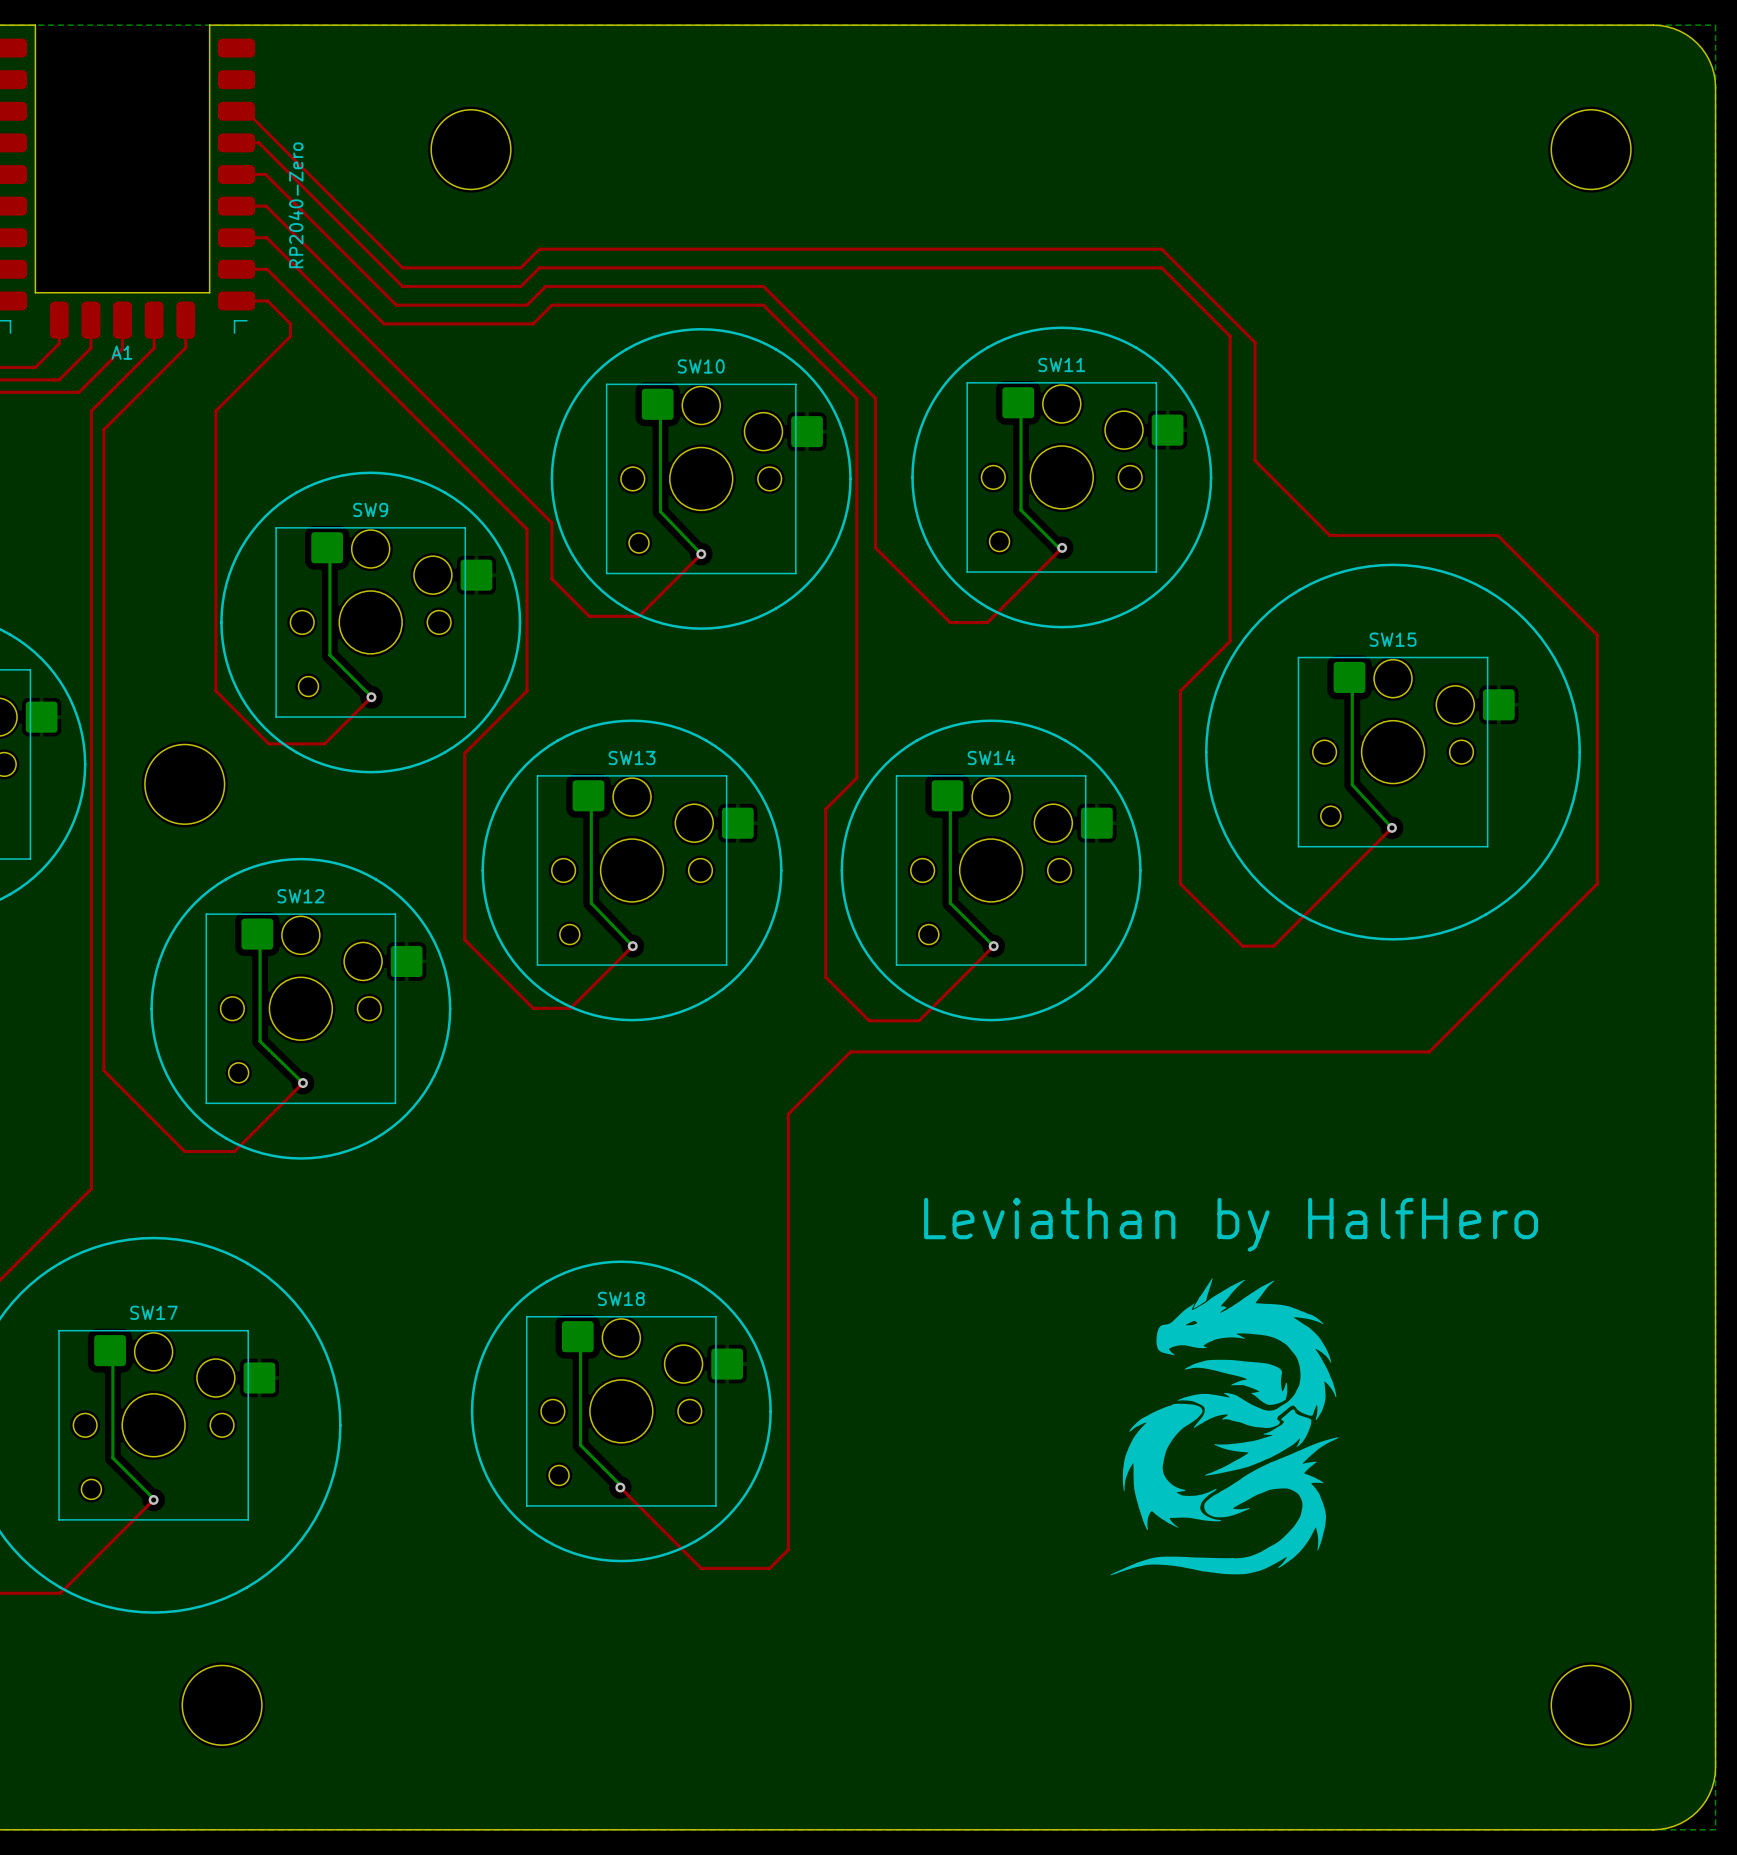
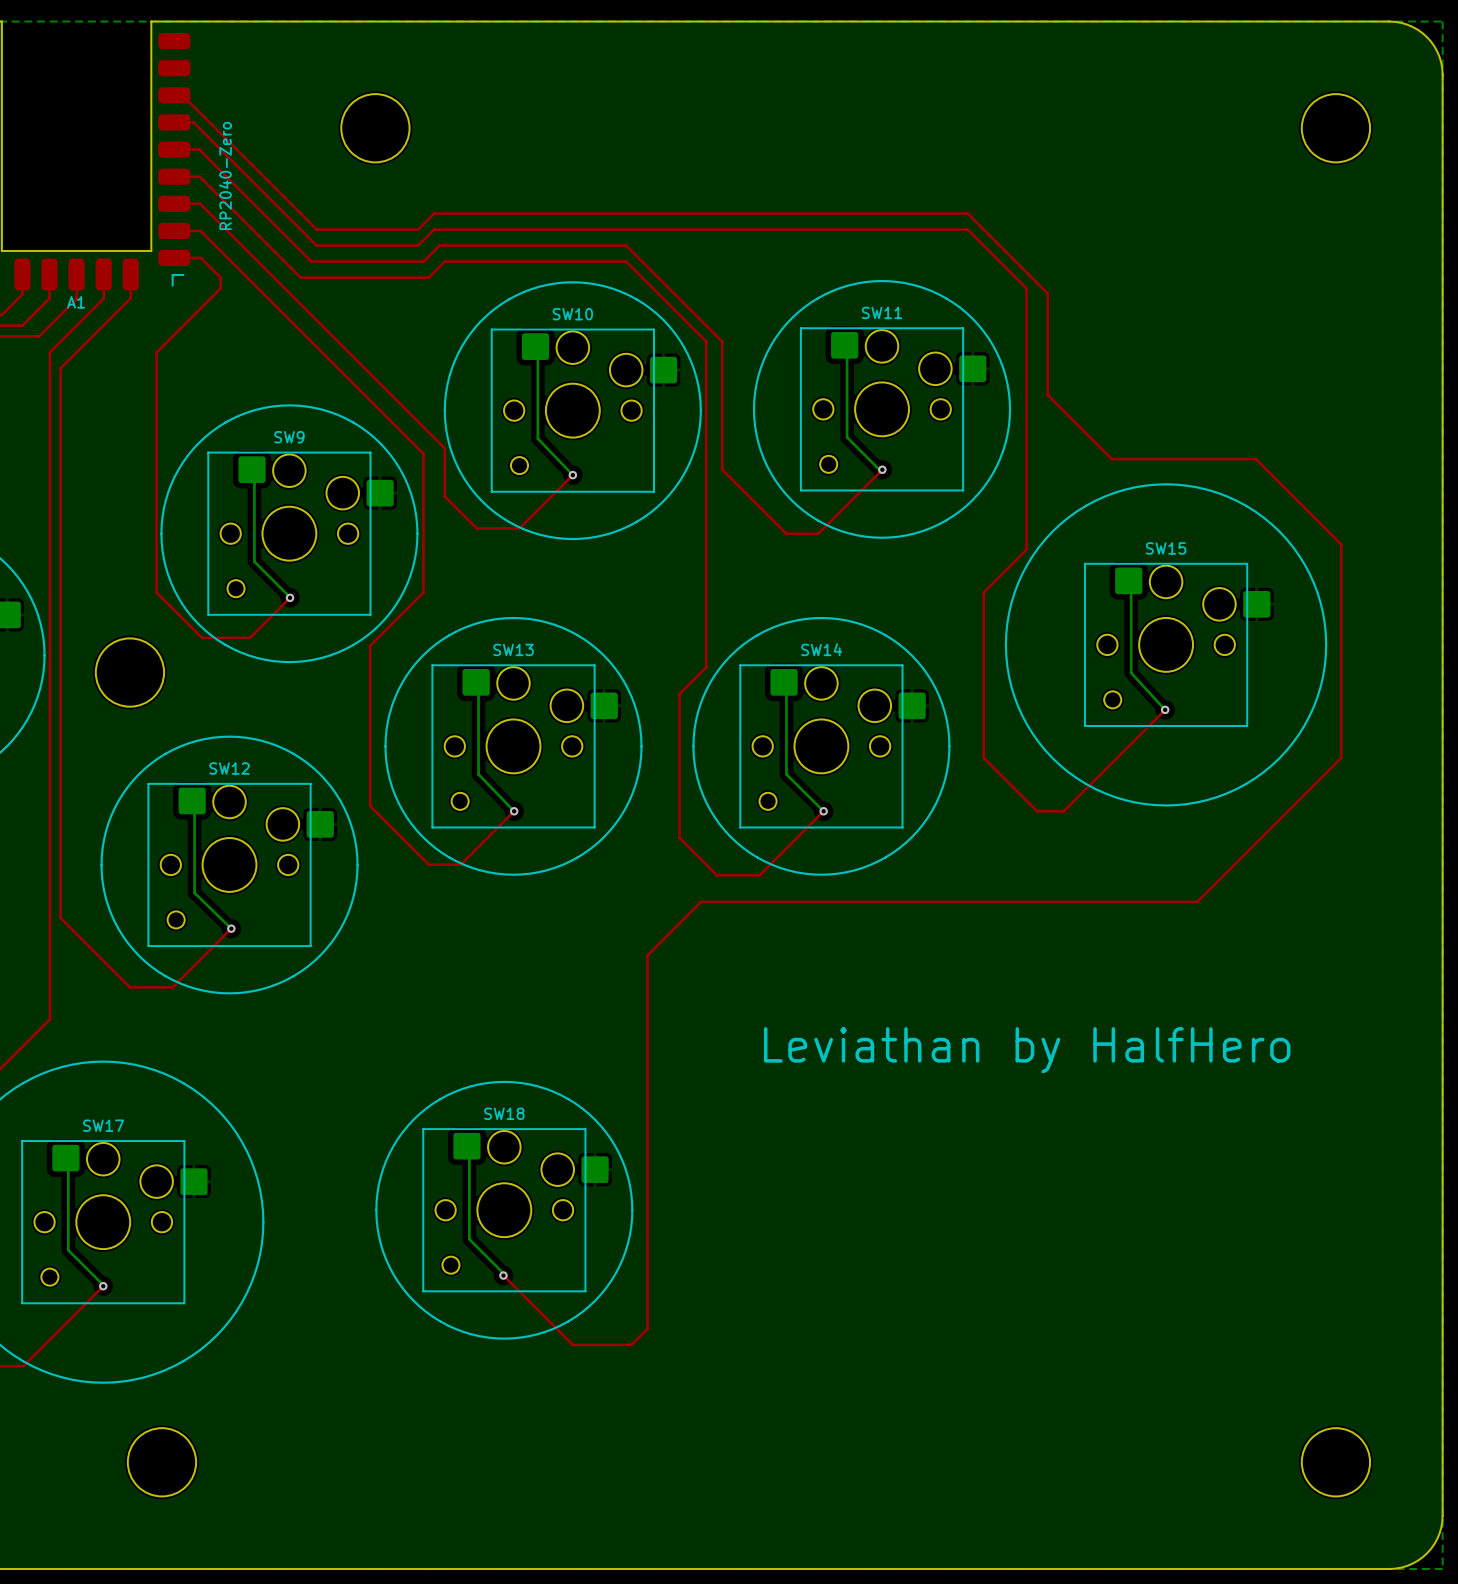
drawing: [1110, 1277, 1339, 1576] -> none

